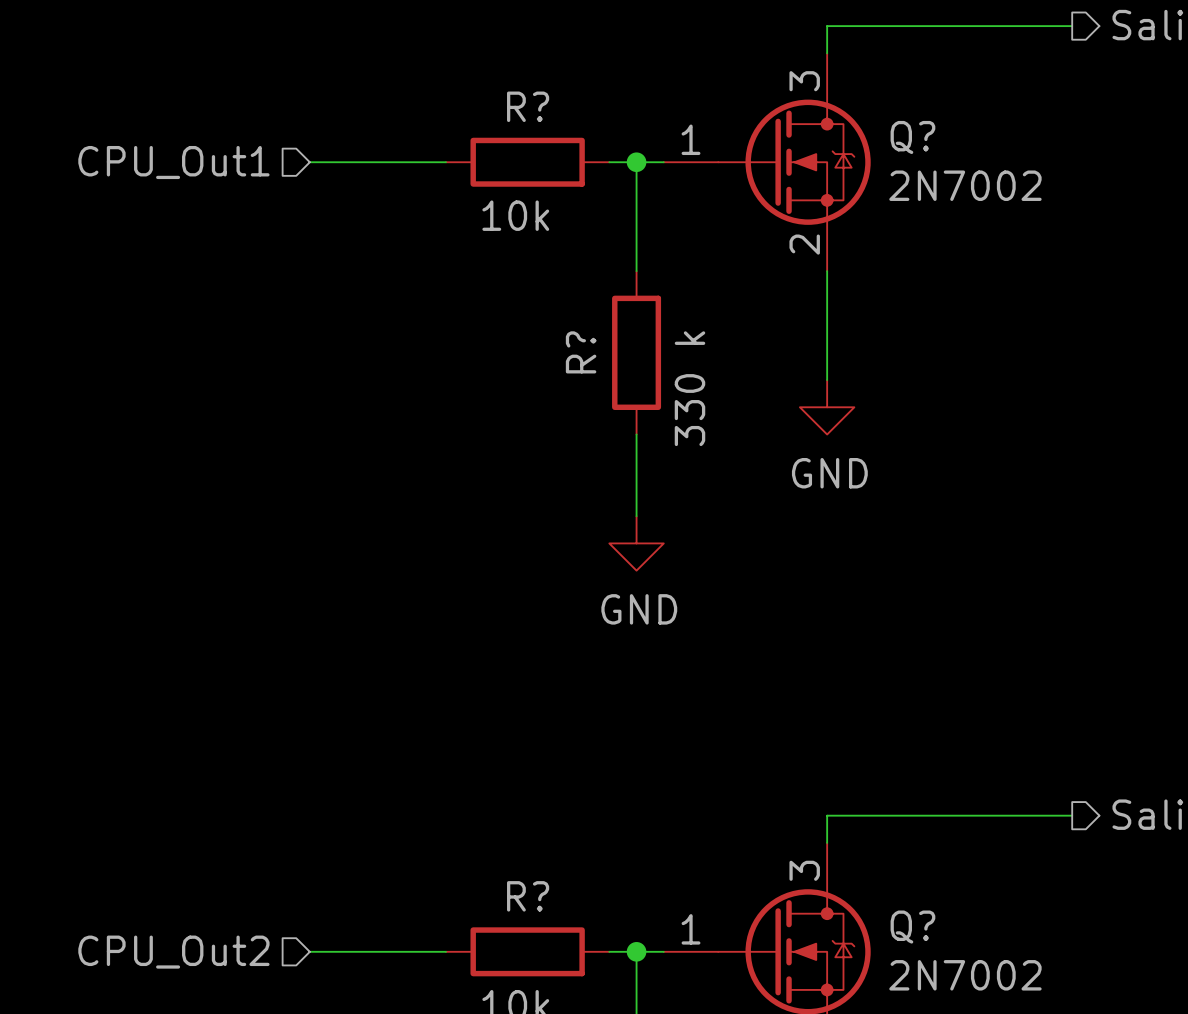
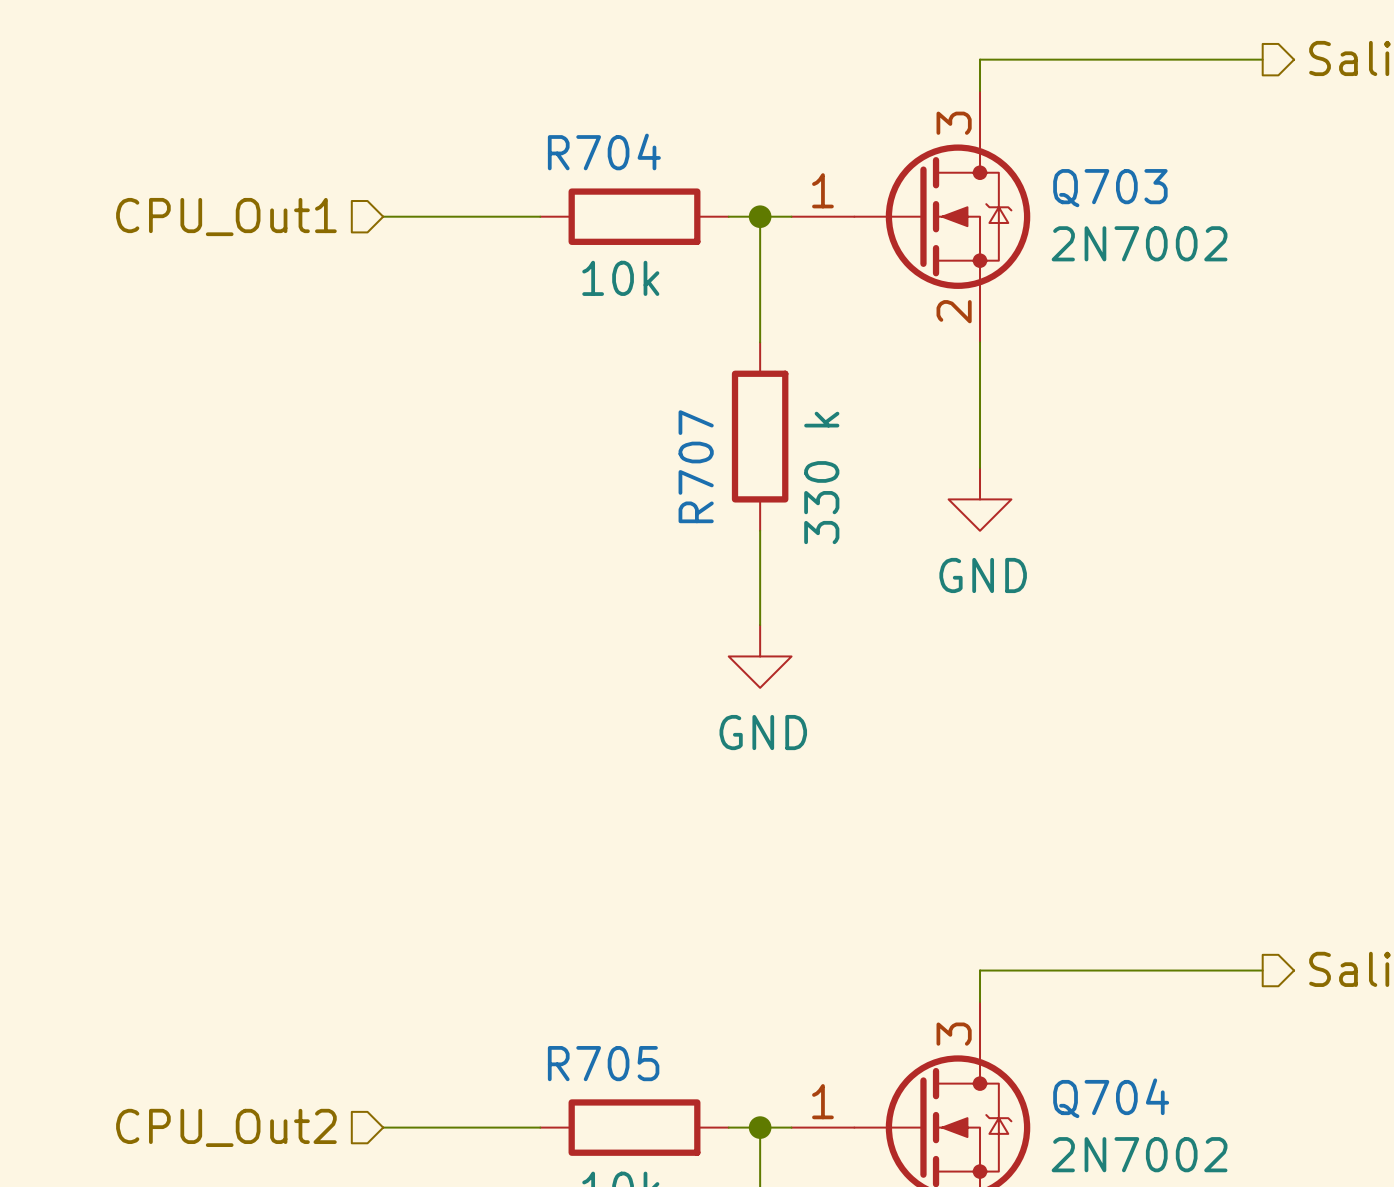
R? name: R? (528, 106) -> R704 (604, 151)
Q? name: Q? (912, 137) -> Q703 (1110, 188)
R? name: R? (581, 352) -> R707 (696, 466)
R? name: R? (528, 896) -> R705 (603, 1063)
Q? name: Q? (912, 927) -> Q704 (1111, 1098)

